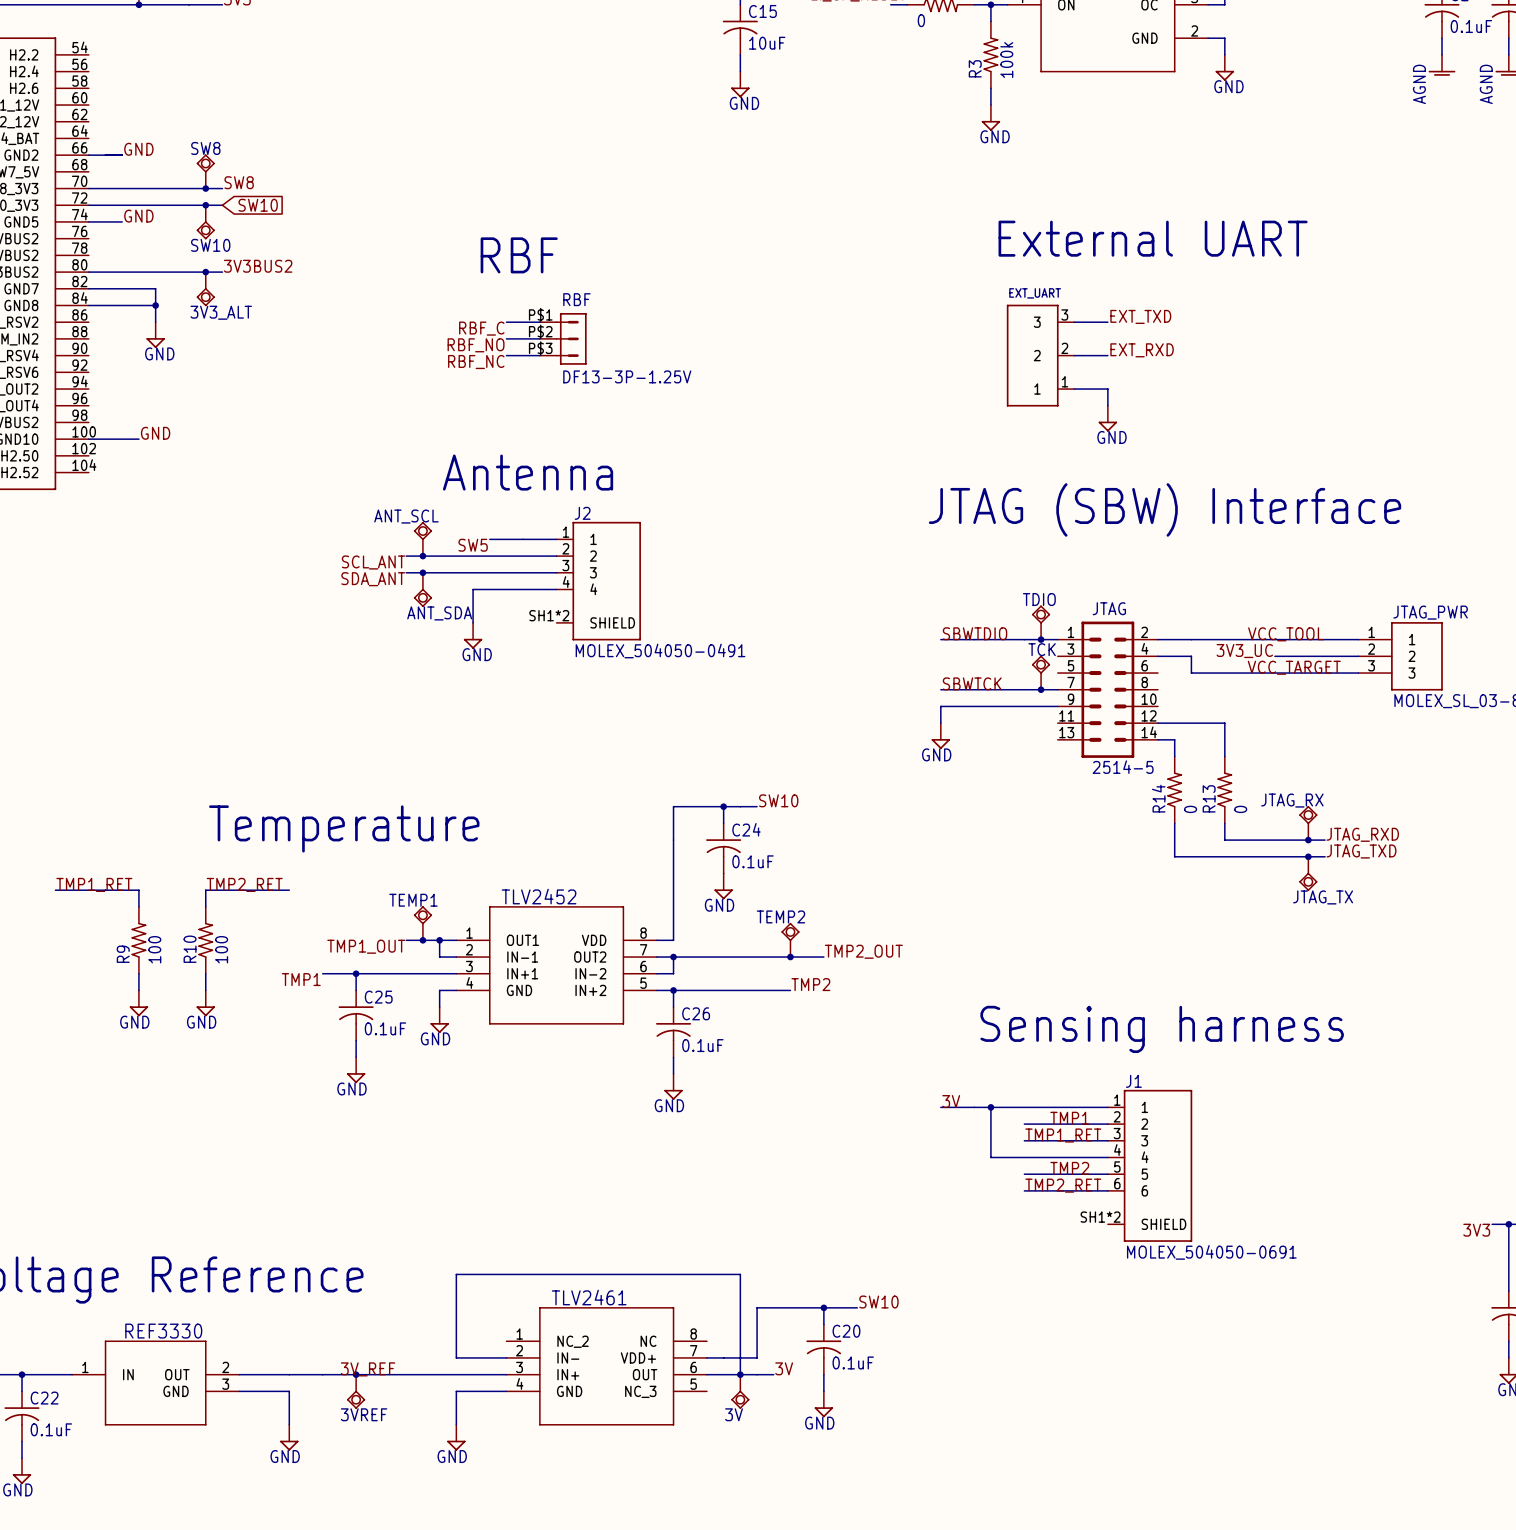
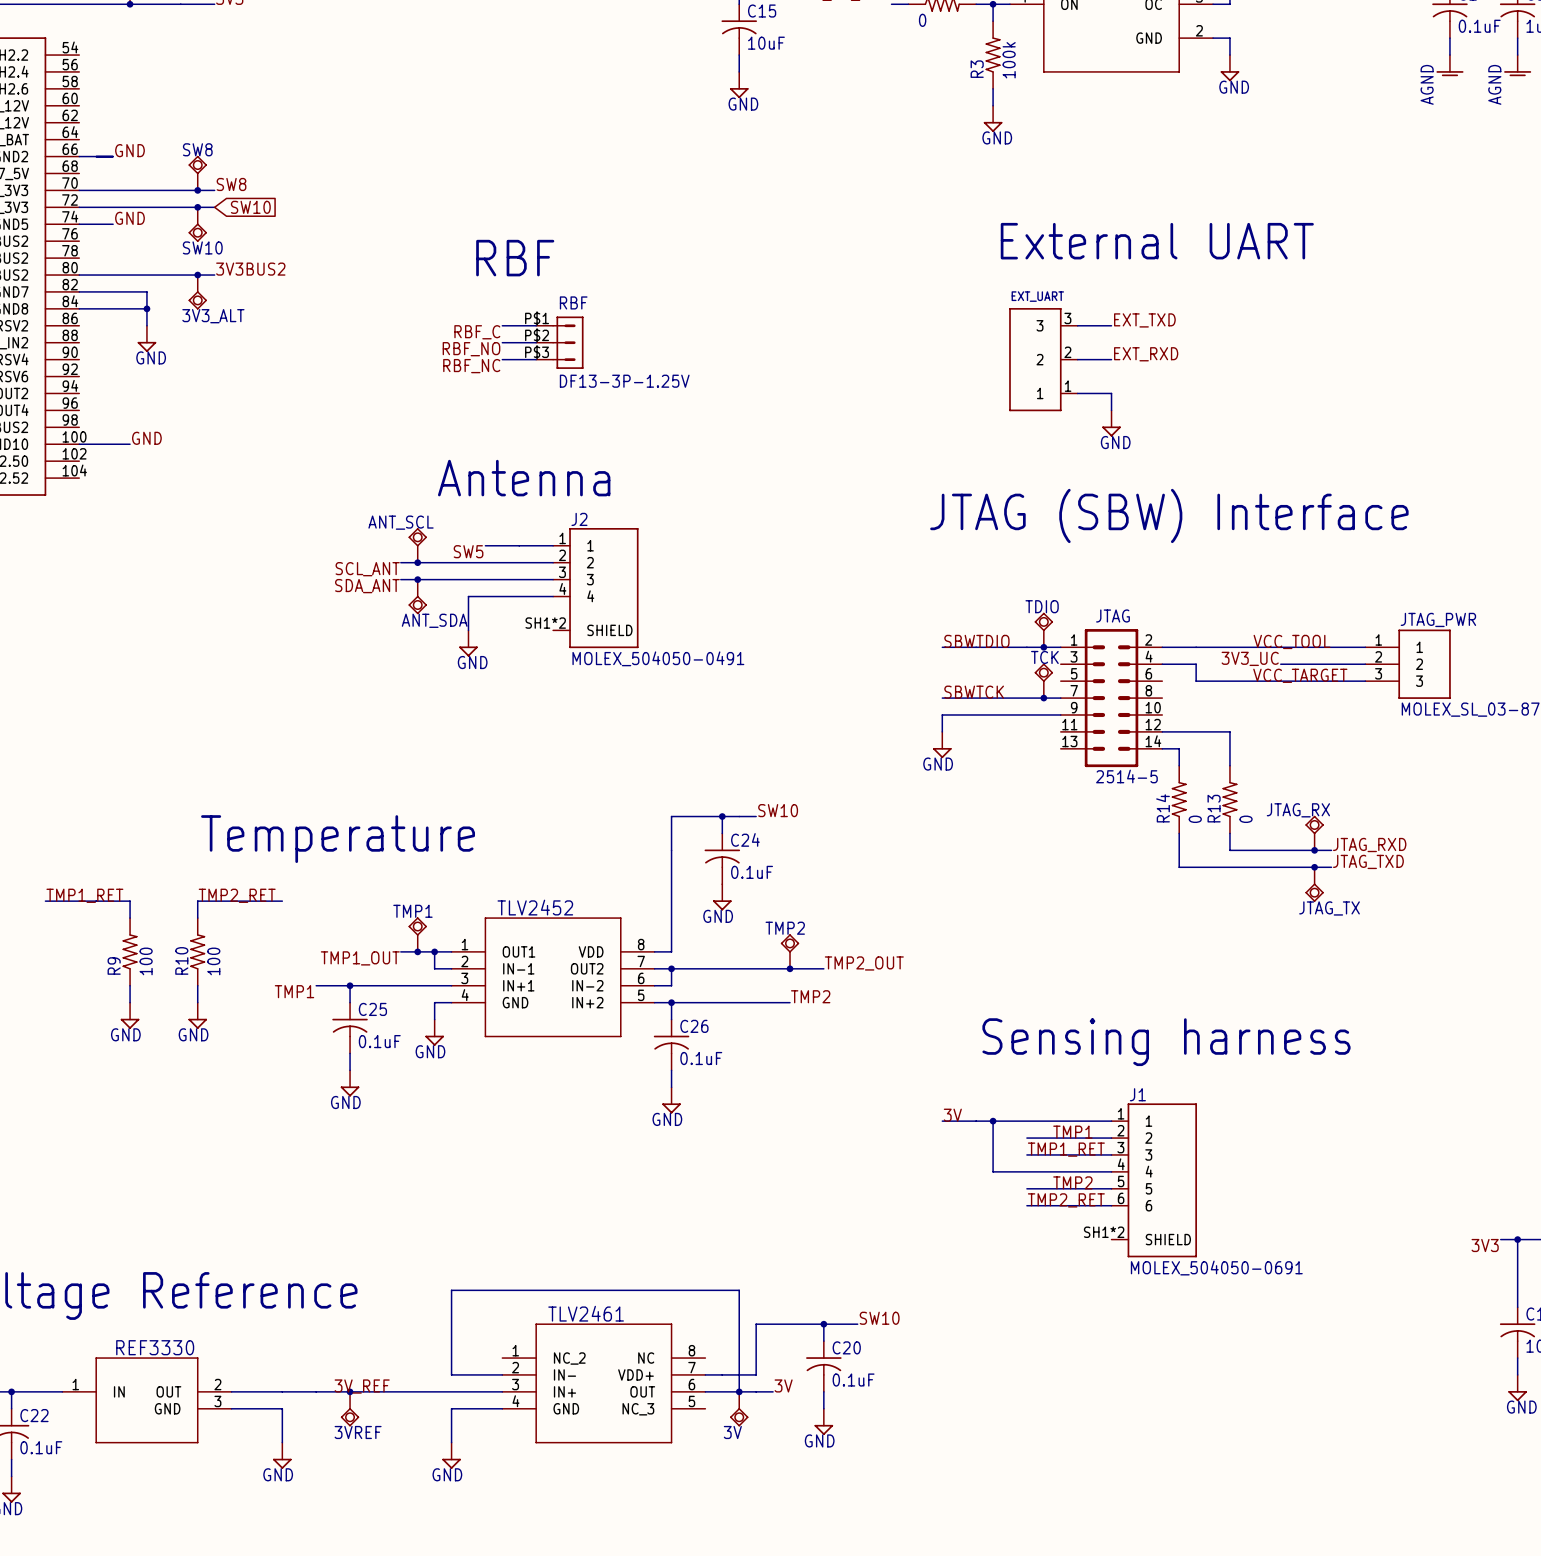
TEMP1 name: TEMP1 (413, 900) -> TMP1 (412, 911)
TEMP2 name: TEMP2 (781, 916) -> TMP2 (785, 928)

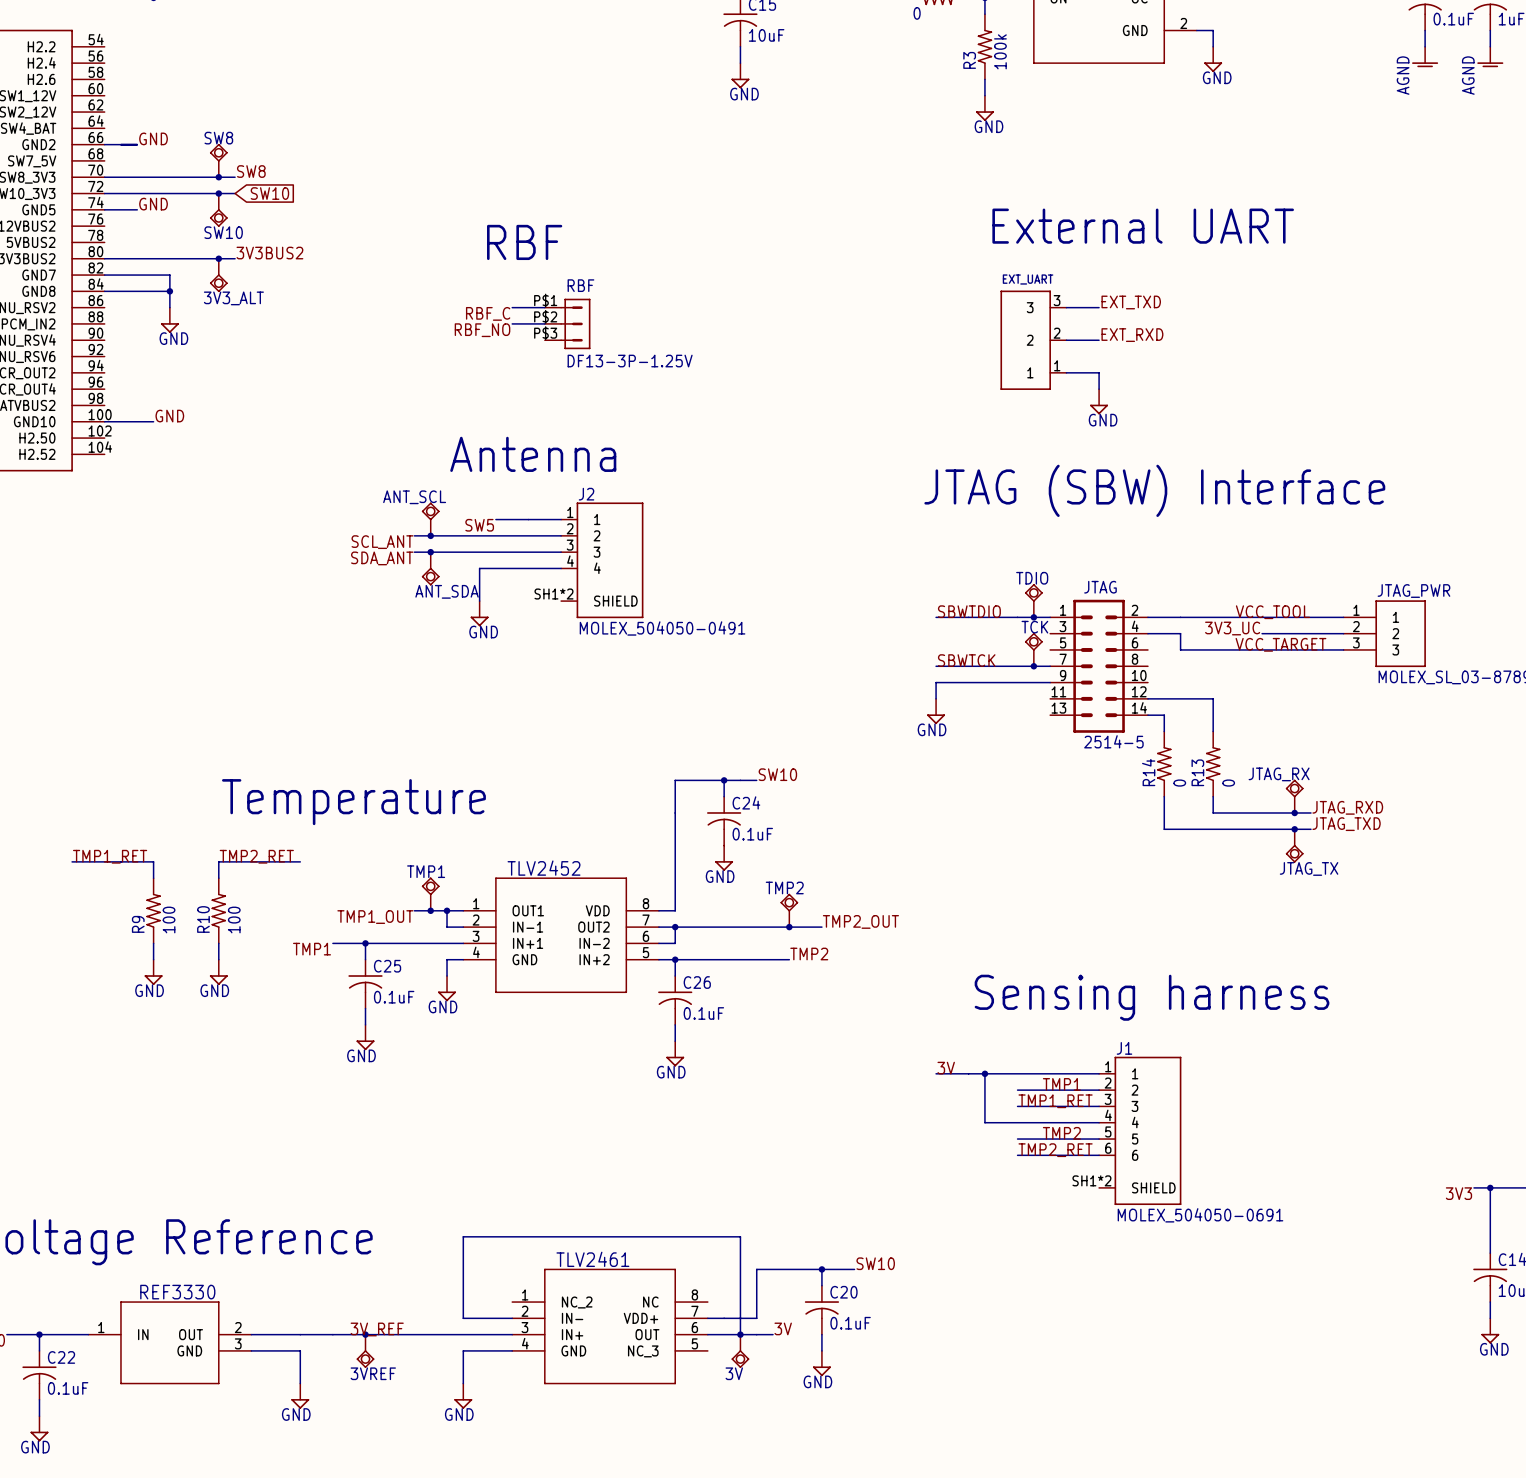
wire: (502, 359) (536, 359) -> none
label: RBF_NC (471, 366) -> none

